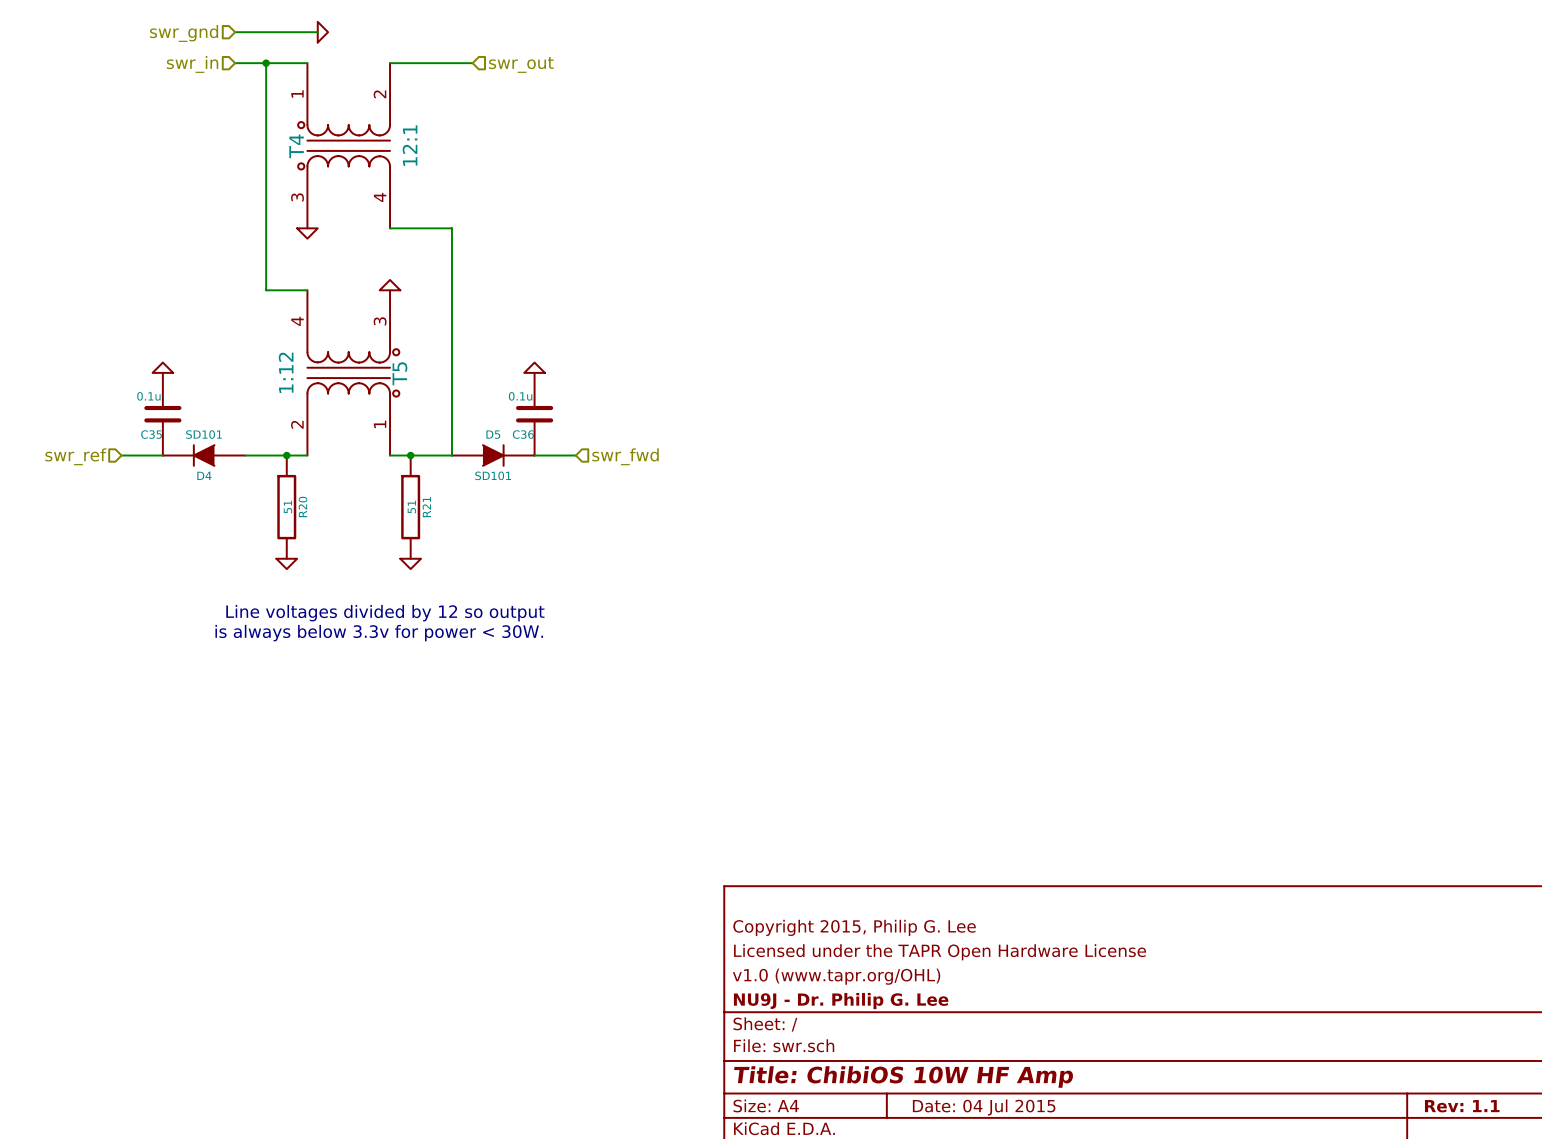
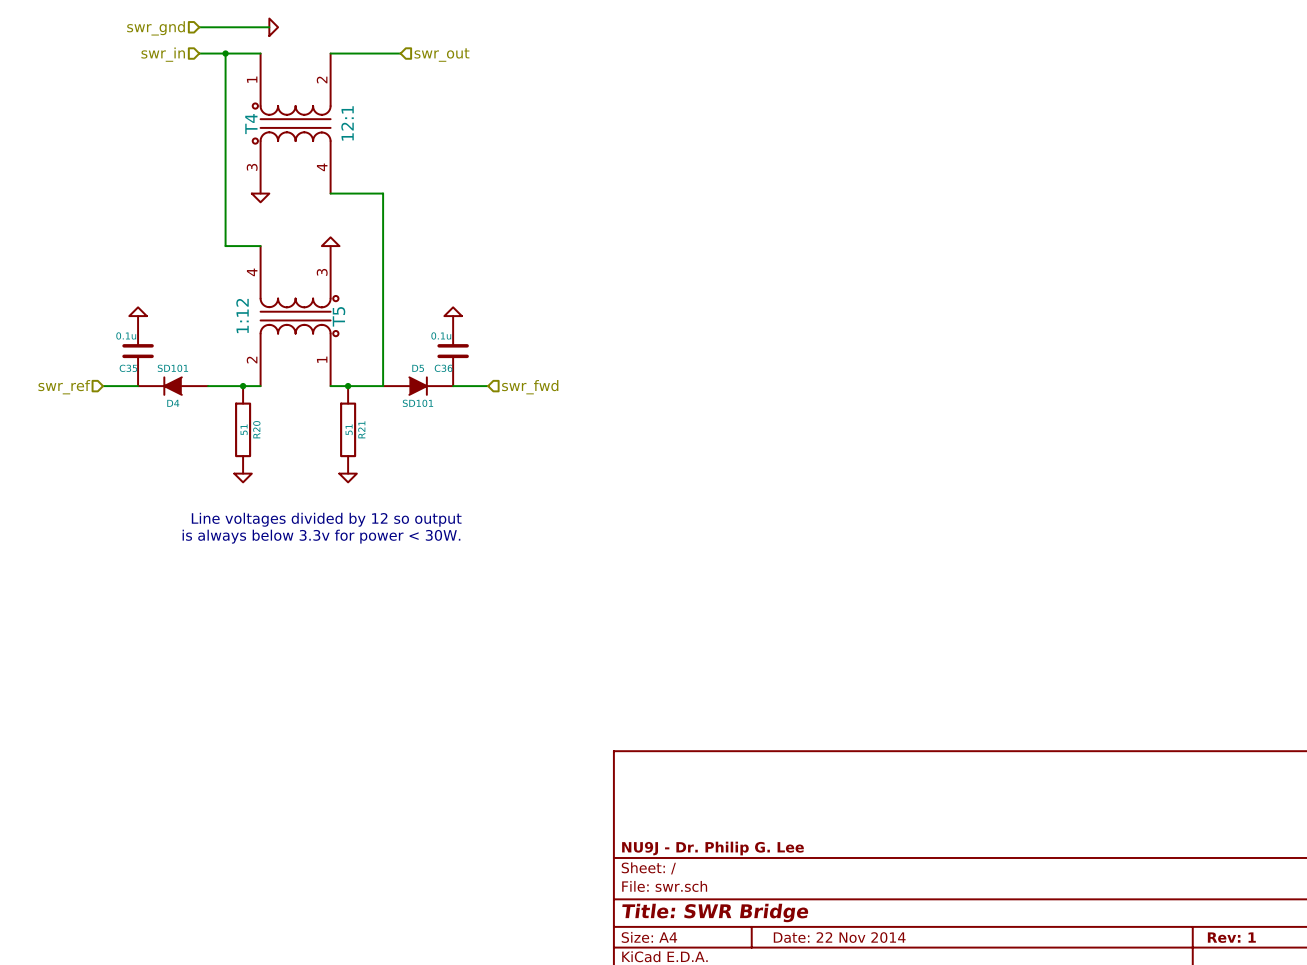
title block: Copyright 2015, Philip G. Lee (854, 927) -> none
title block: Licensed under the TAPR Open Hardware License (940, 952) -> none
title block: v1.0 (www.tapr.org/OHL) (836, 976) -> none
title block: Title: ChibiOS 10W HF Amp (903, 1077) -> Title: SWR Bridge (715, 912)
title block: Rev: 1.1 (1462, 1106) -> Rev: 1 (1231, 937)
title block: Date: 04 Jul 2015 (984, 1107) -> Date: 22 Nov 2014 (839, 937)

